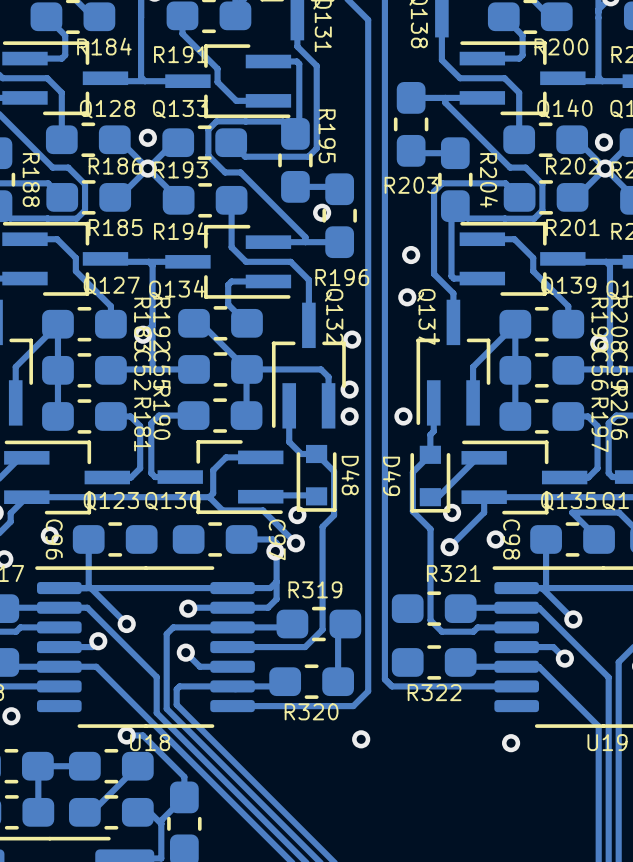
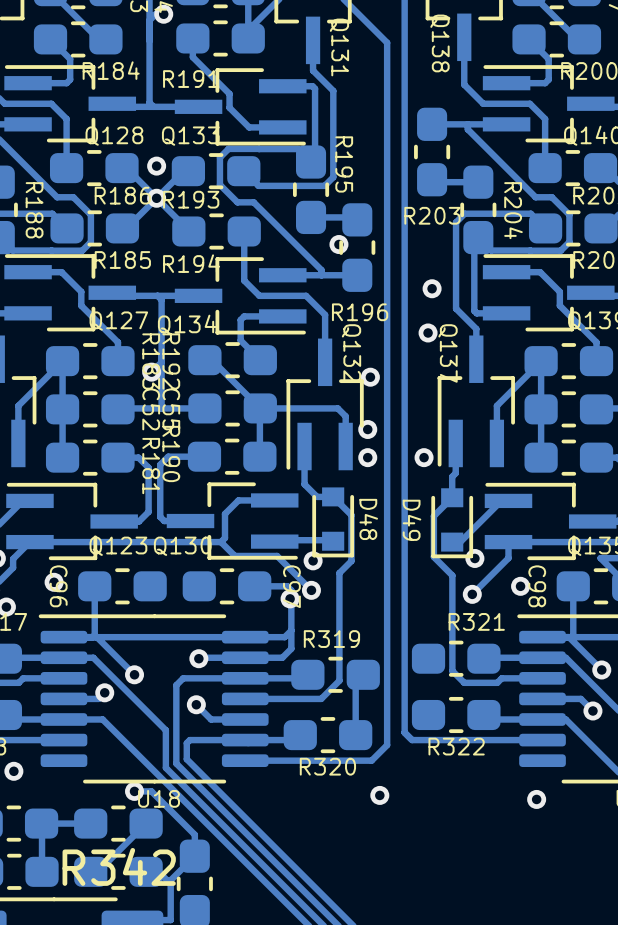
R342 name: none -> R342 (119, 866)

